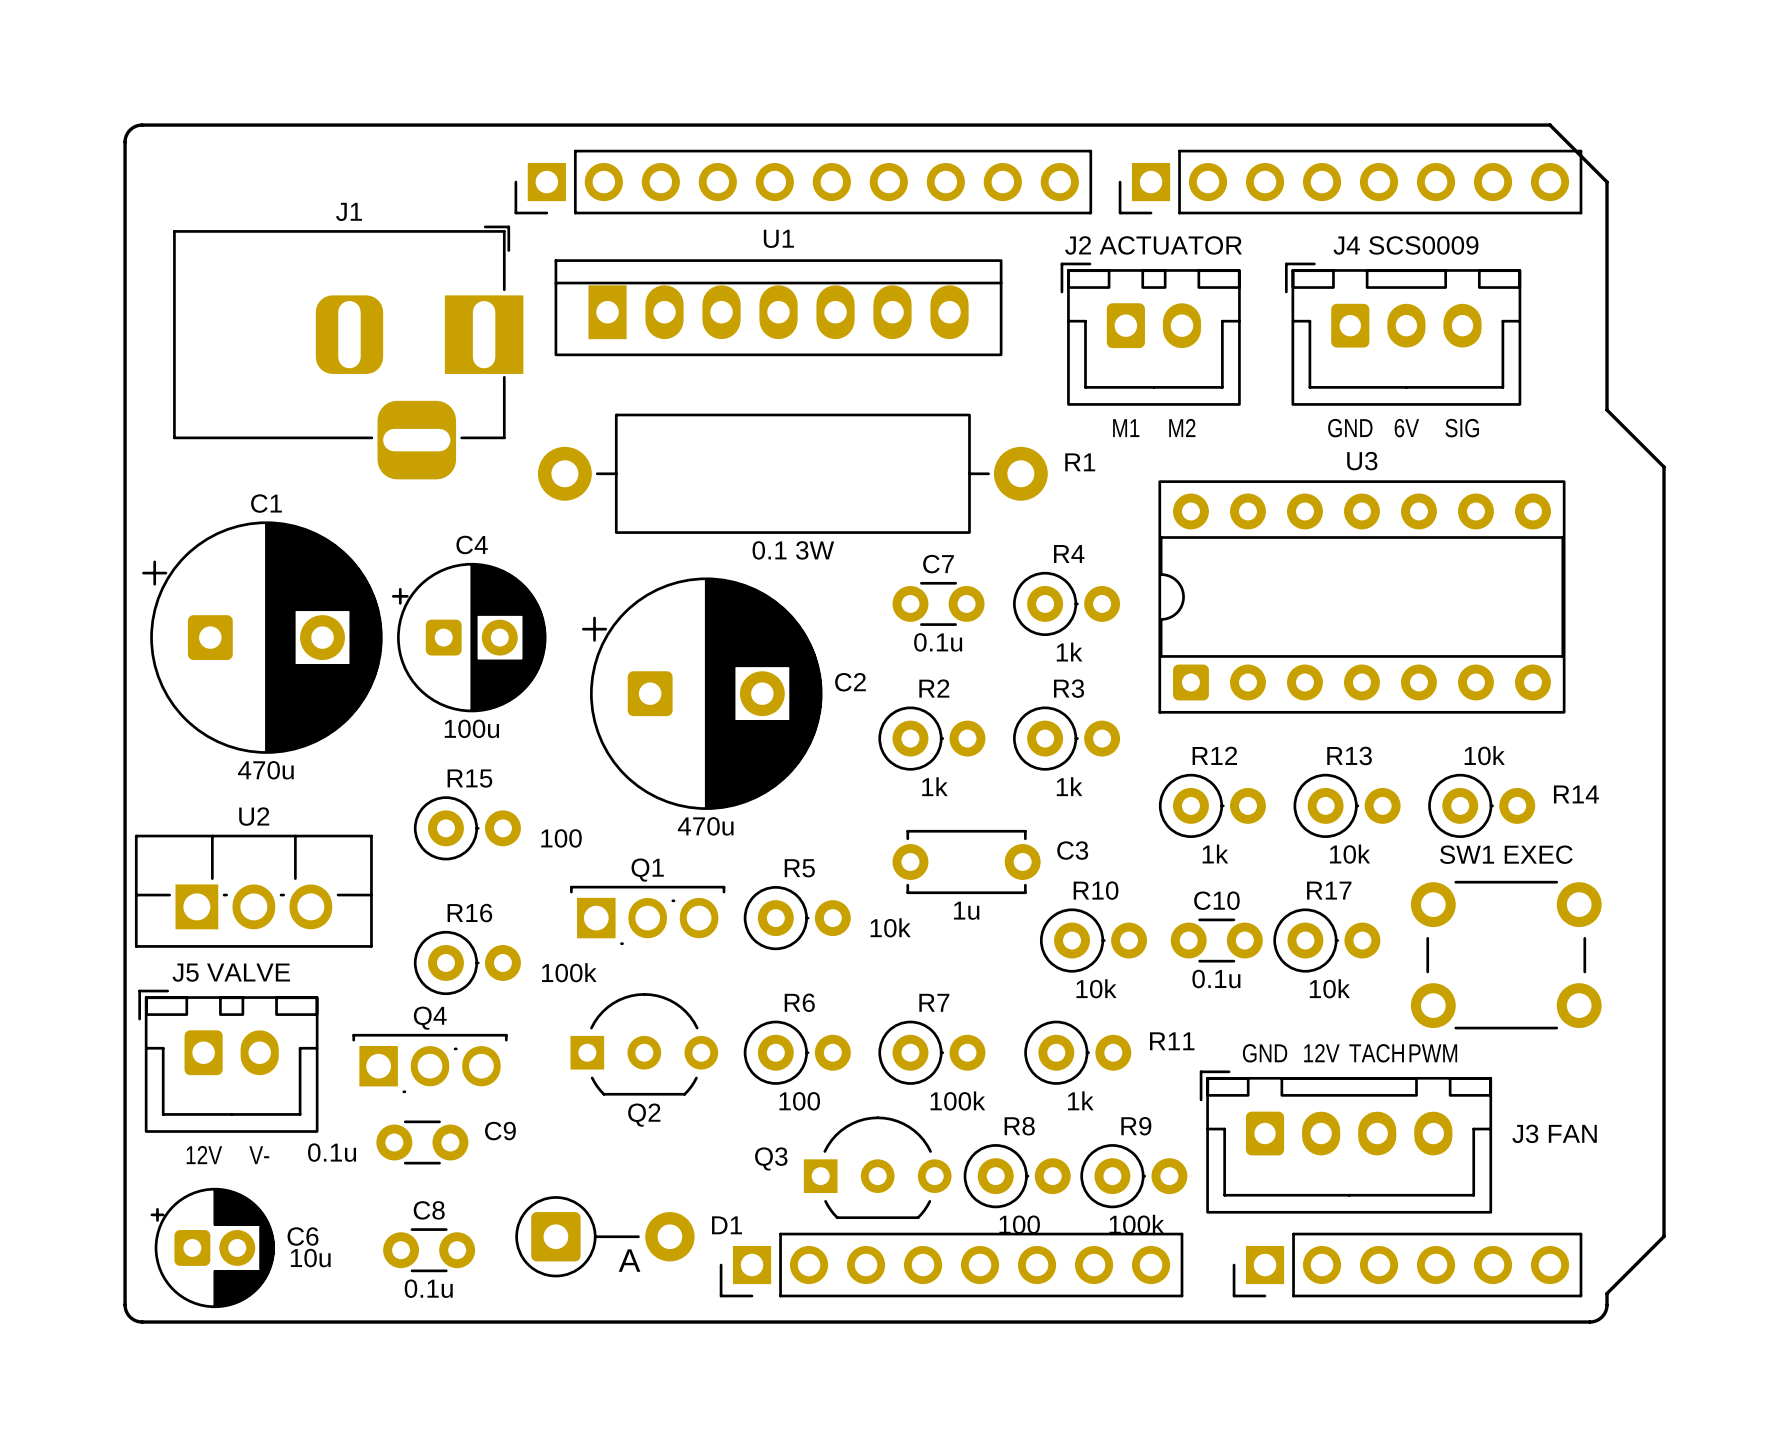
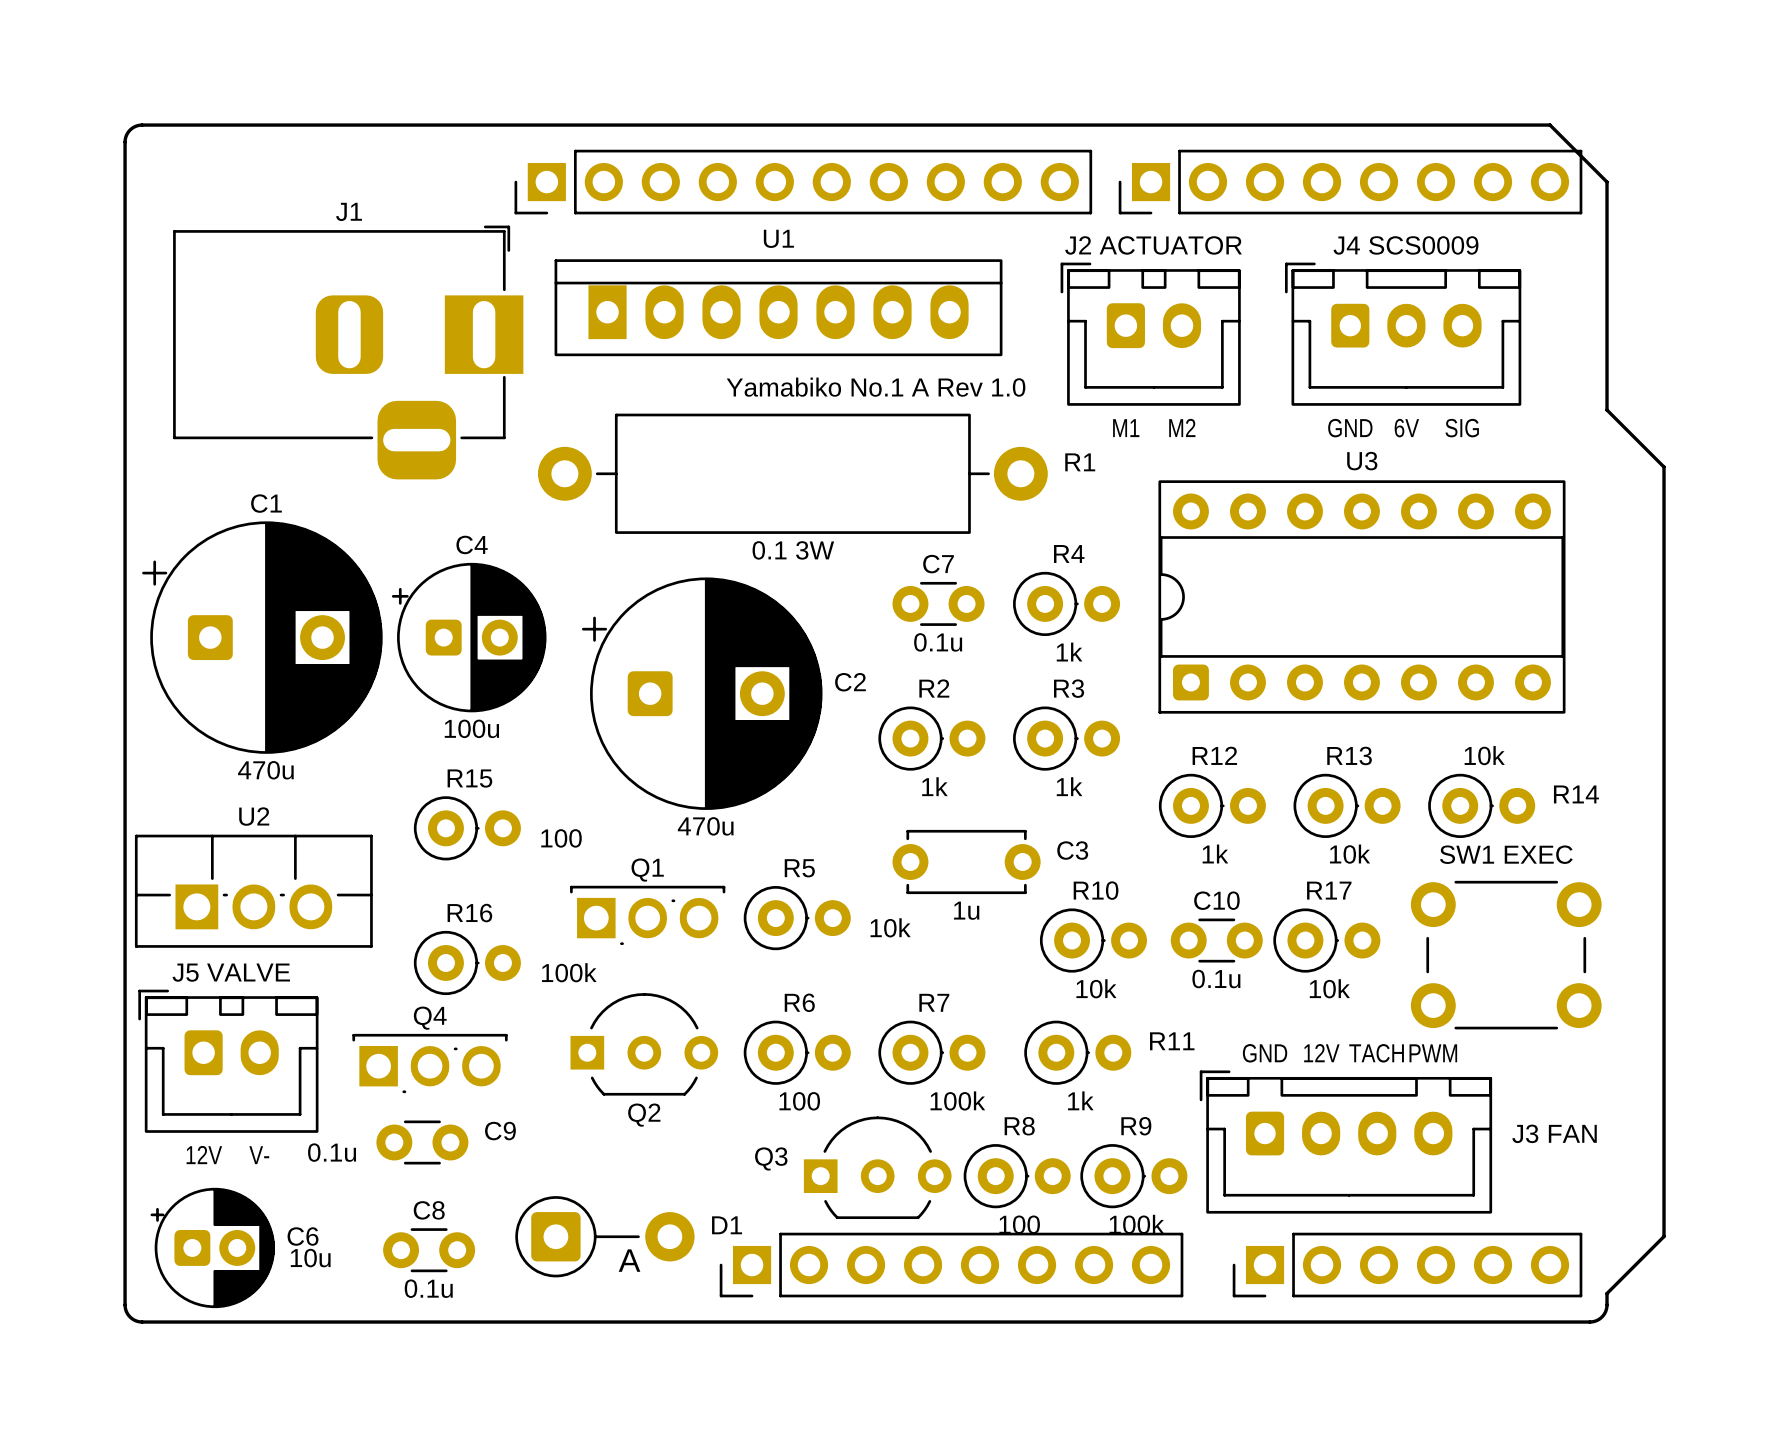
text: none -> Yamabiko No.1 A Rev 1.0 (876, 387)

